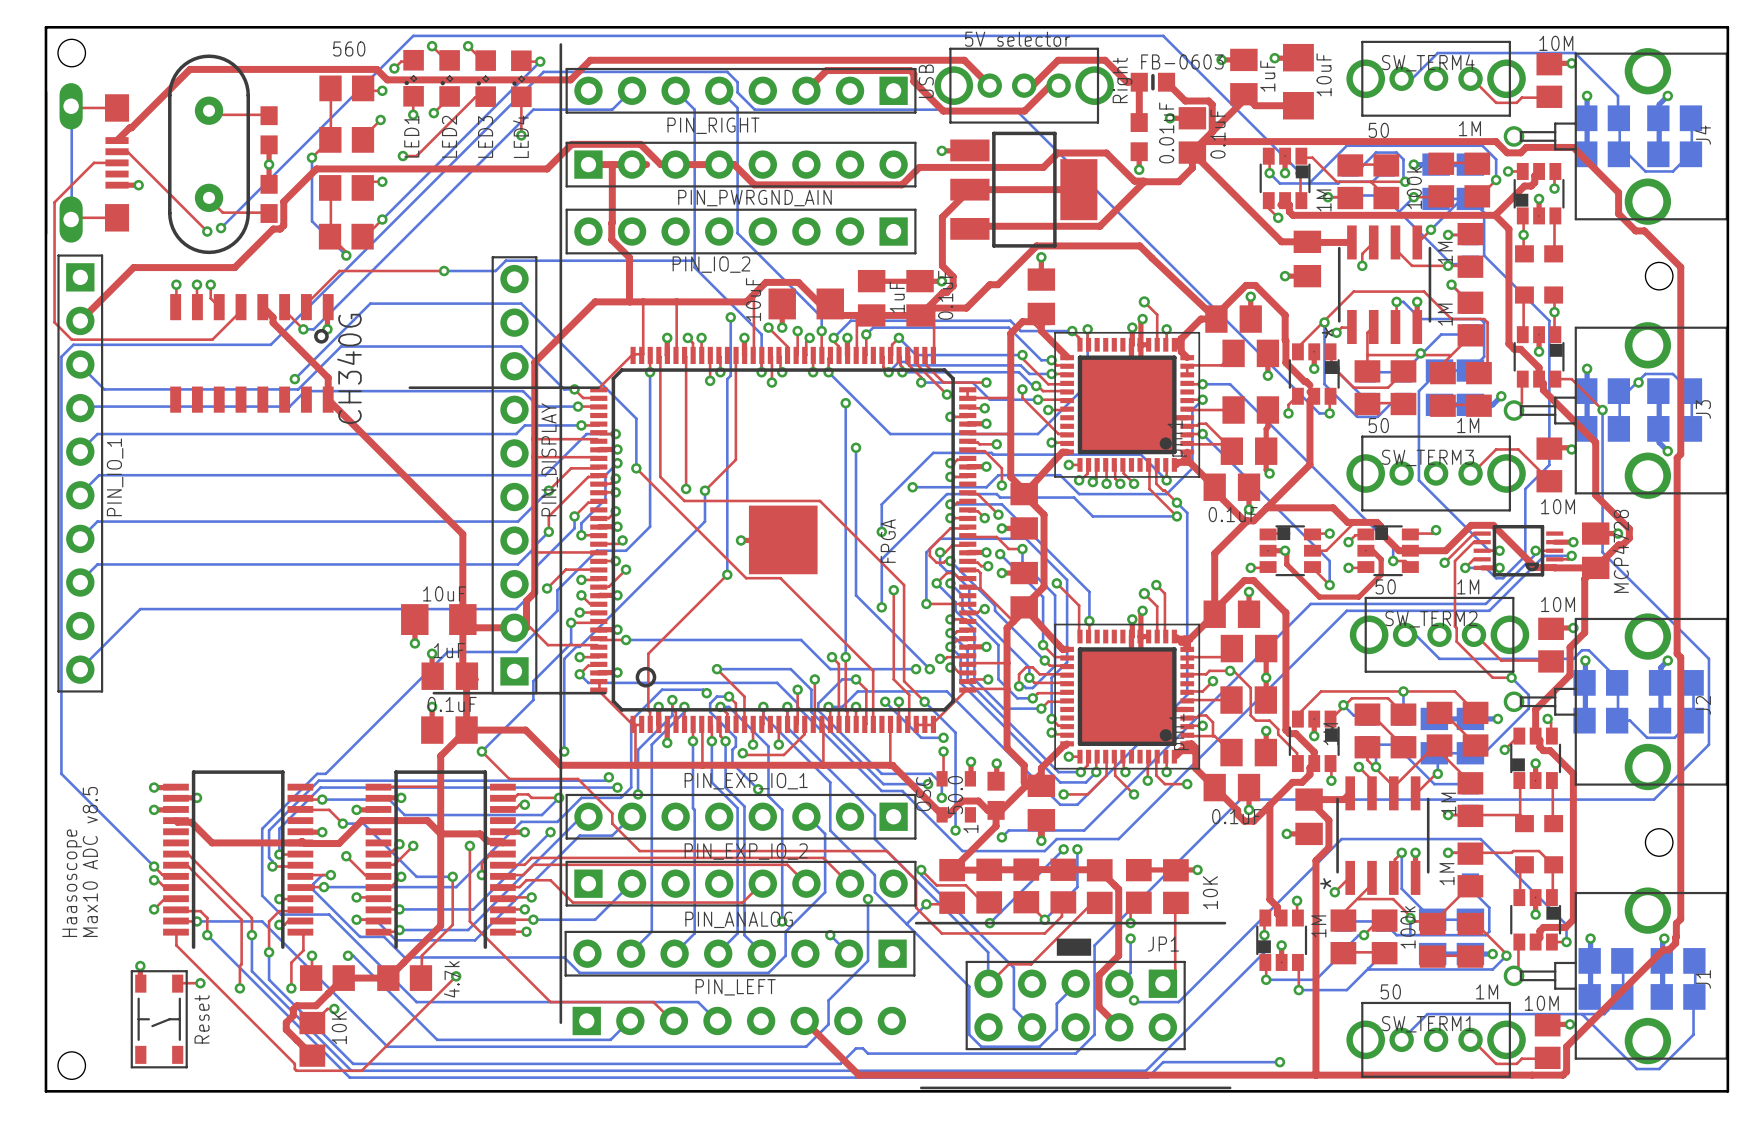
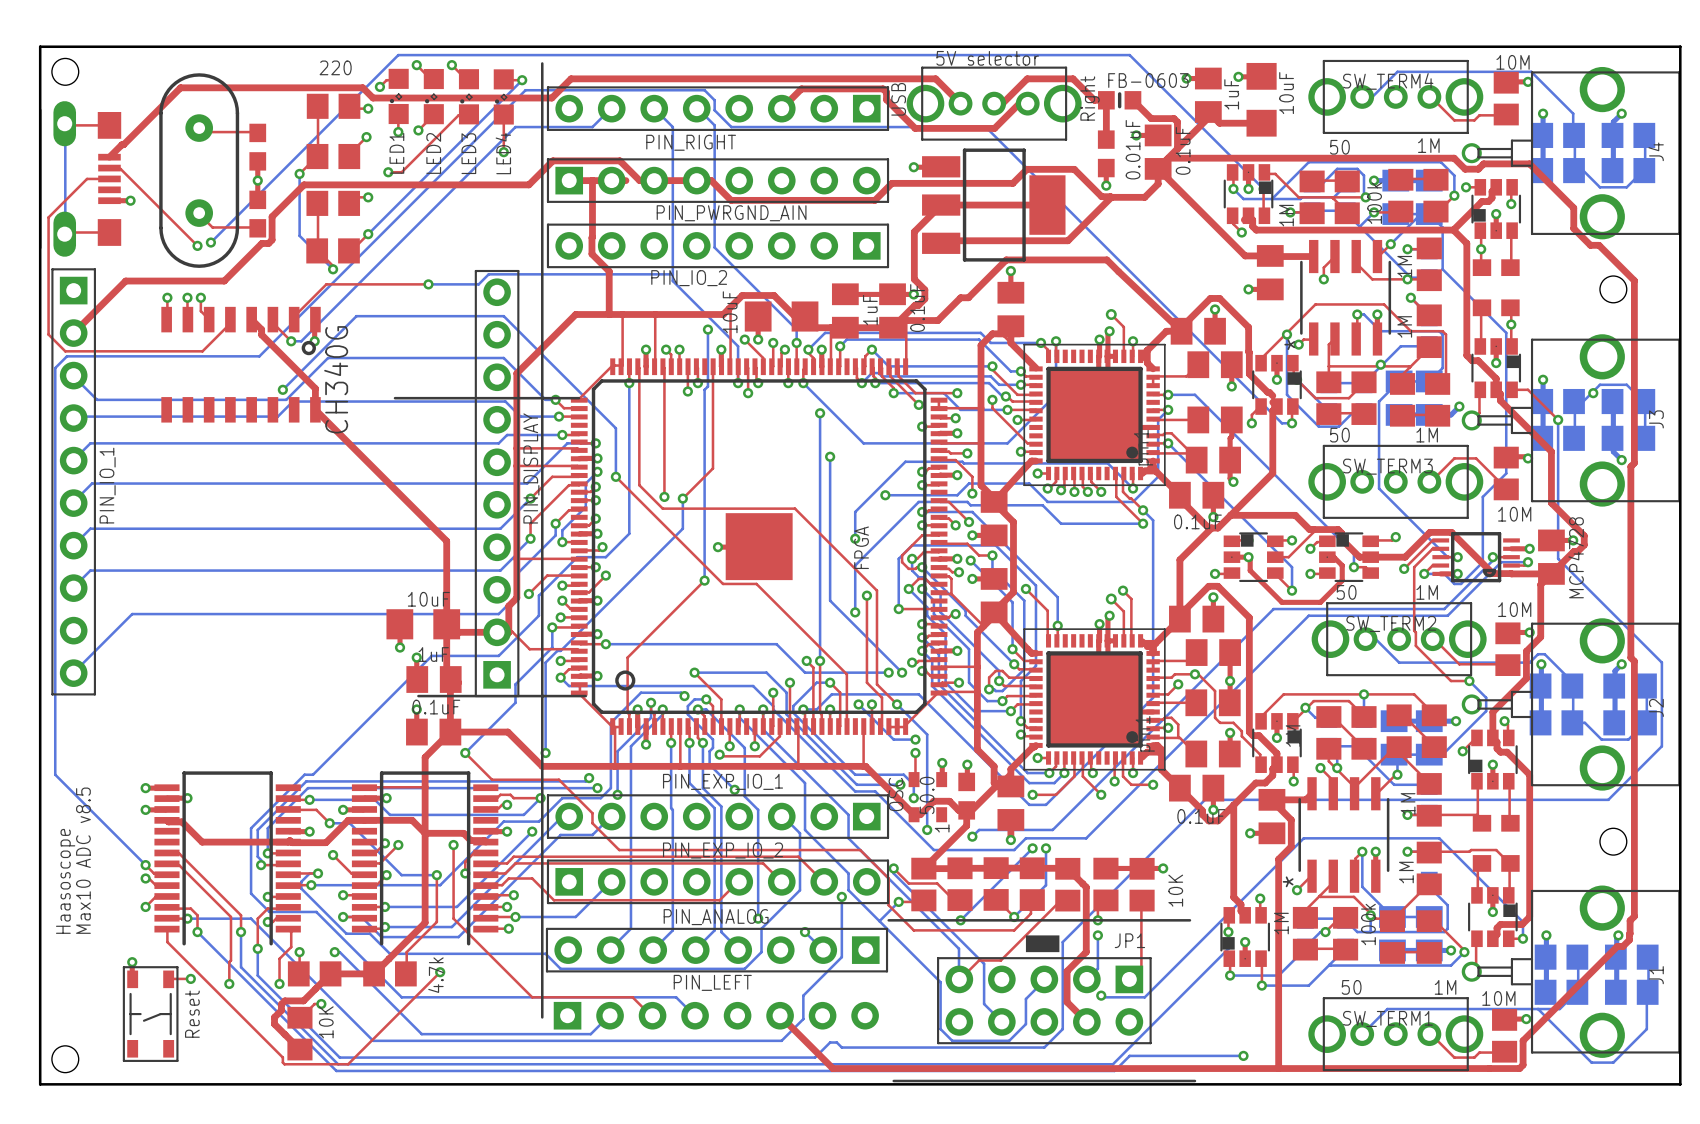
part value: 560 (349, 48) -> 220 (335, 67)

